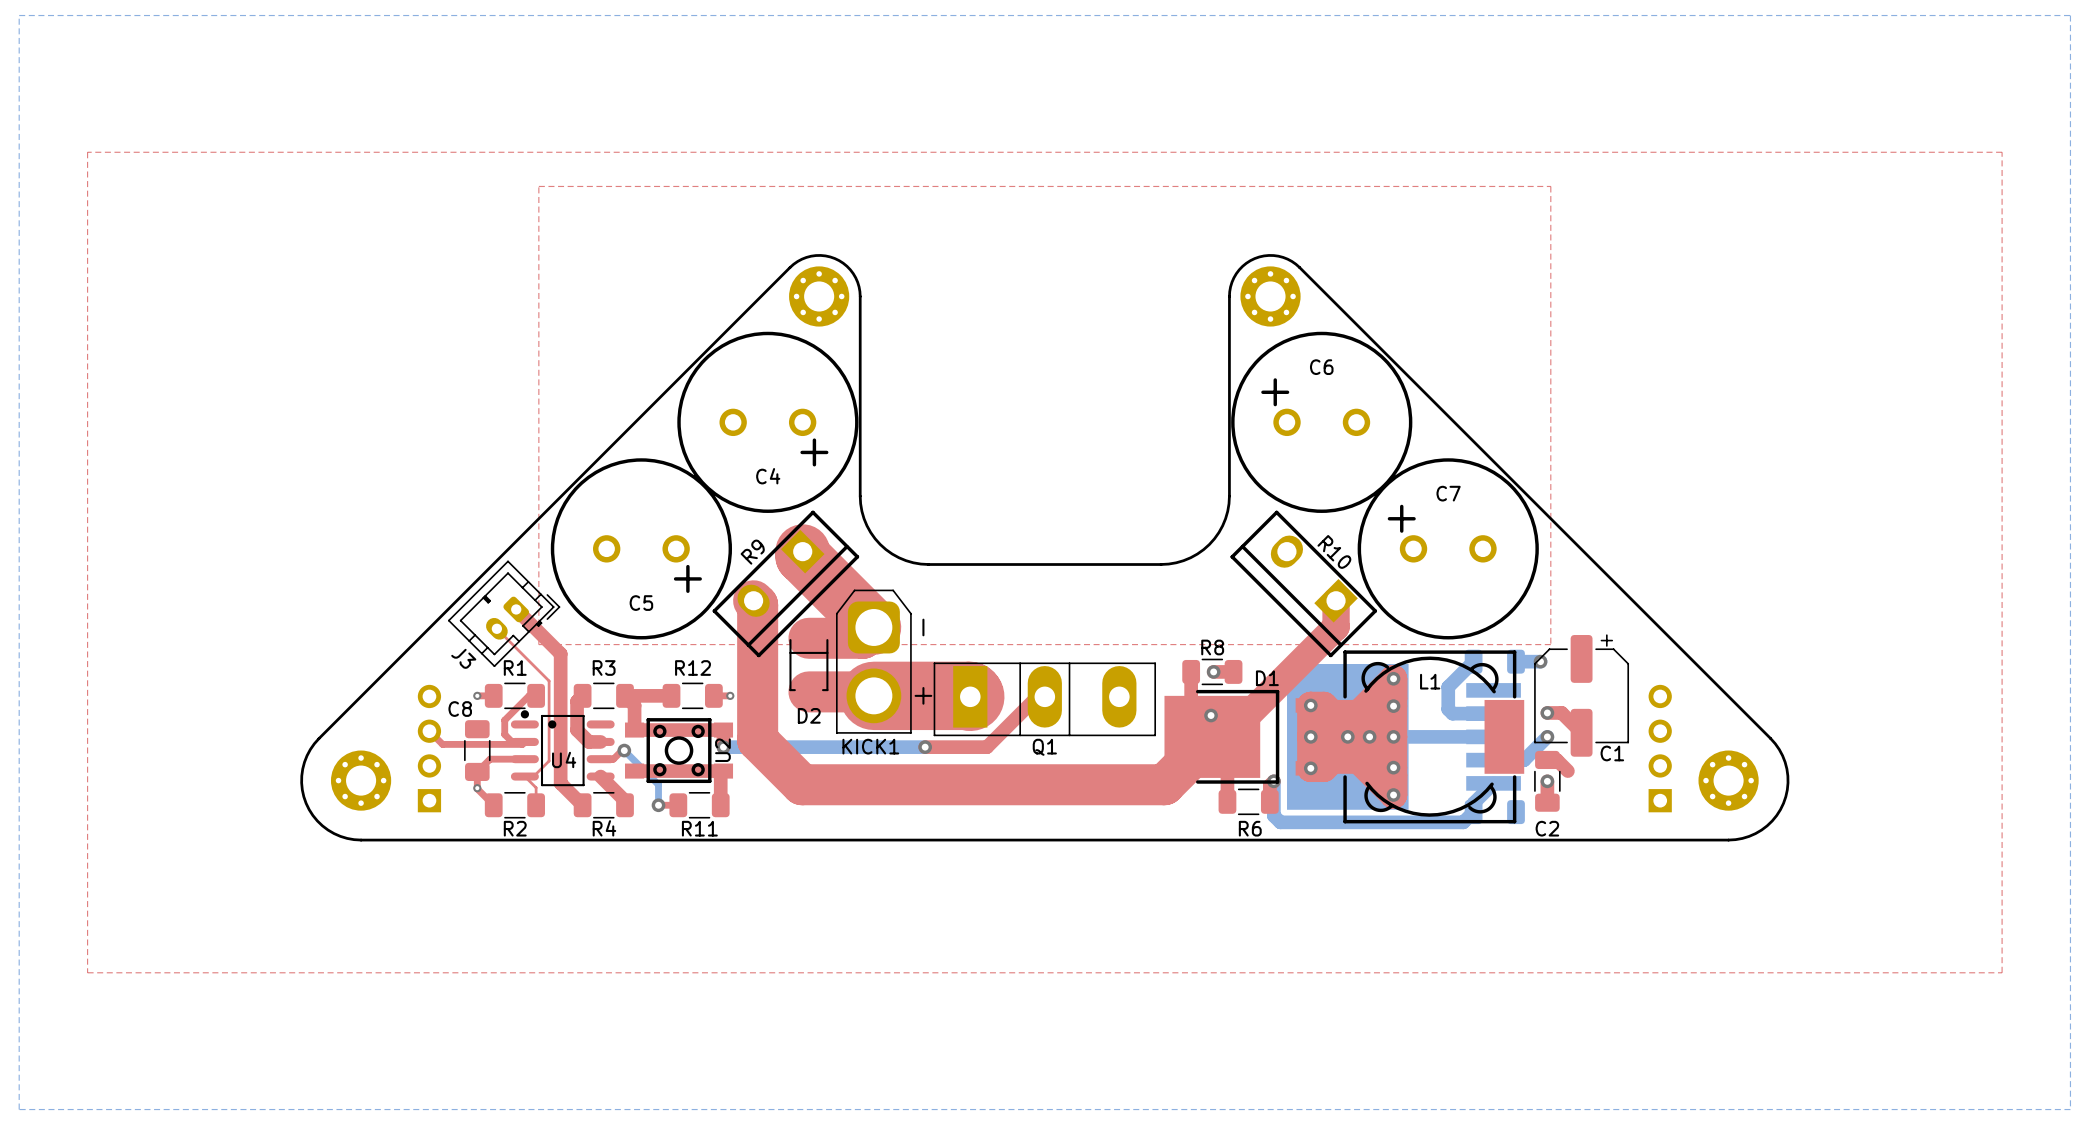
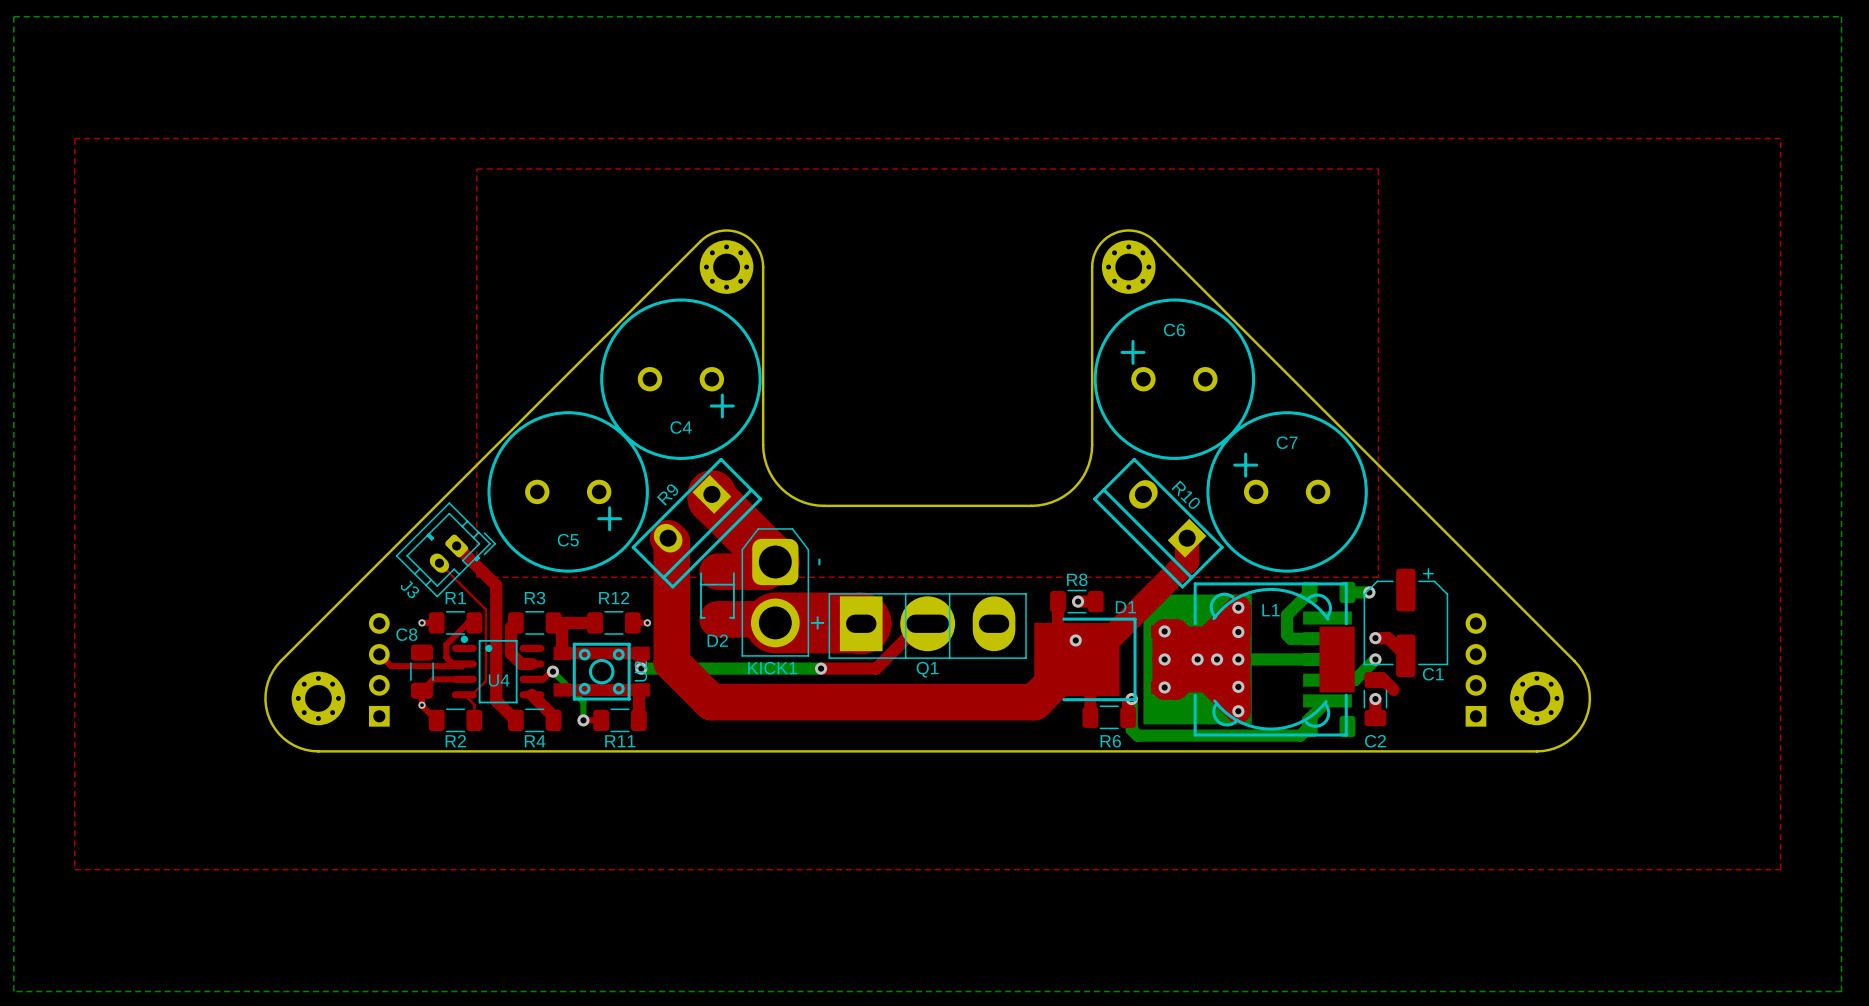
Q1 footprint: [933, 662, 1157, 737] -> [828, 593, 1027, 659]

